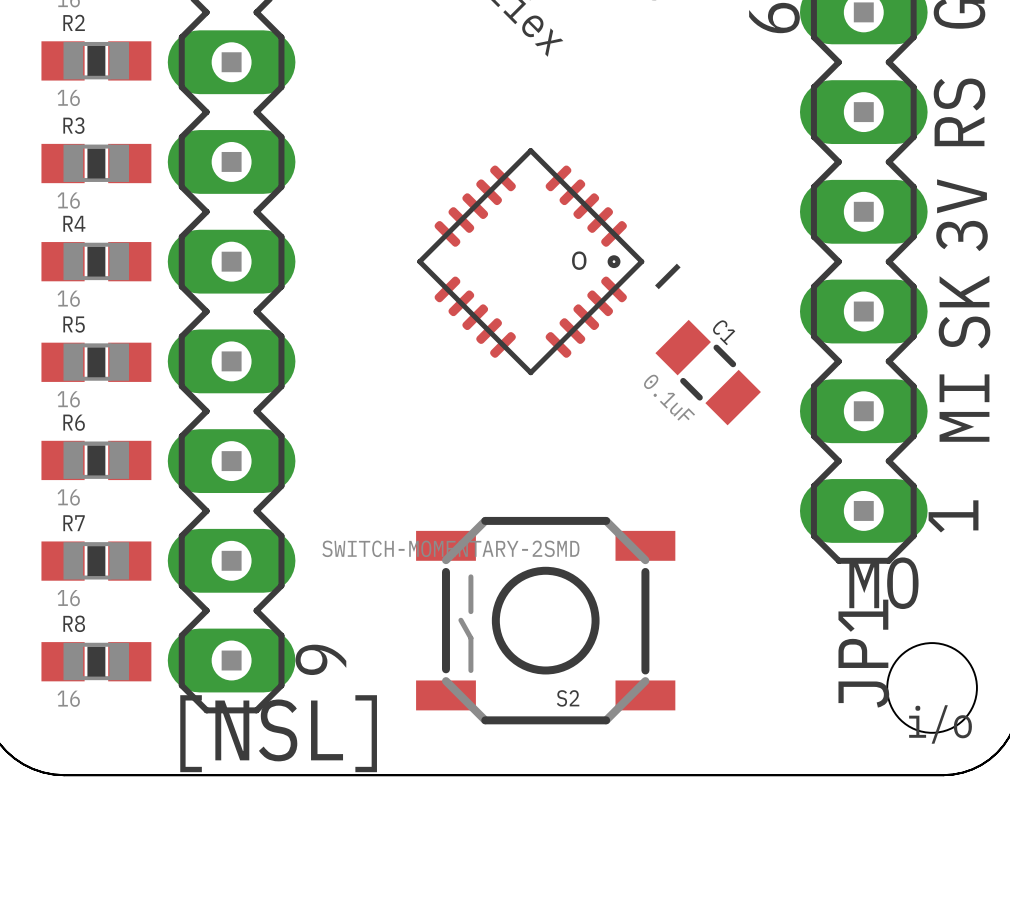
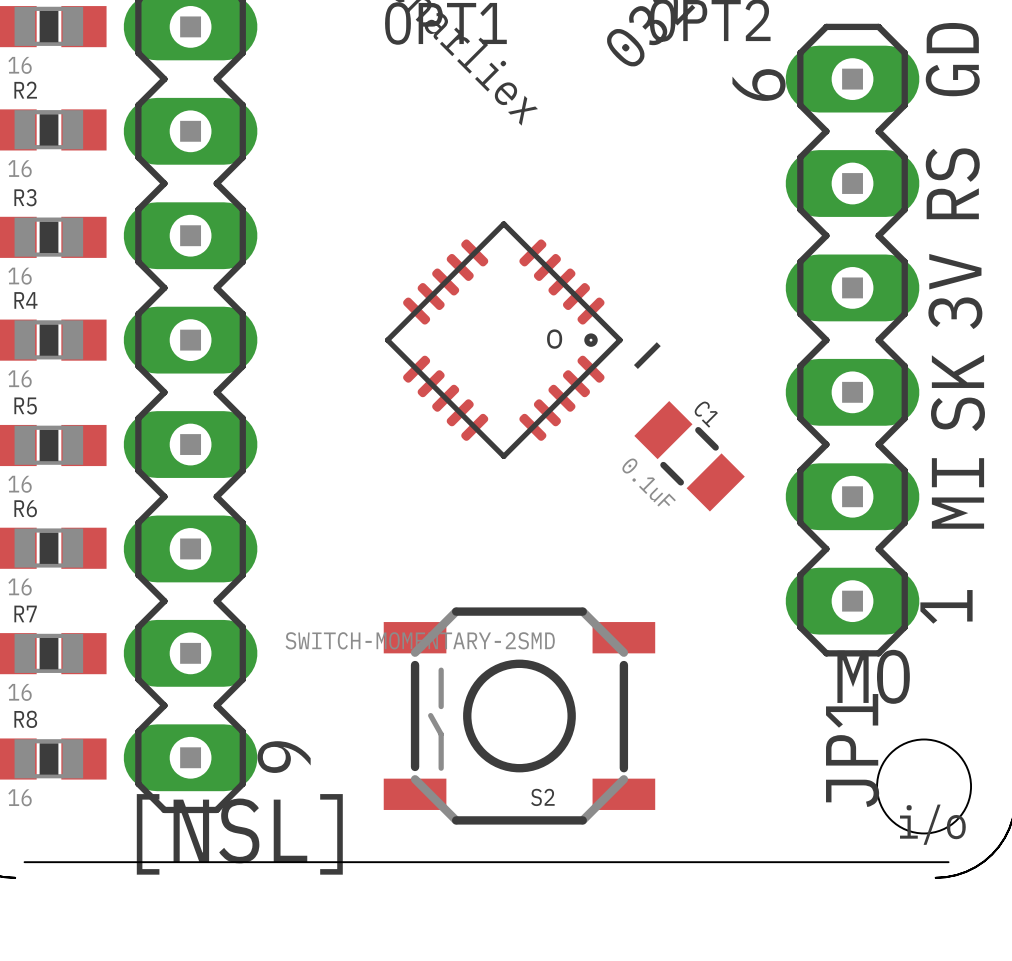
board edge: none -> (24, 862) (948, 862)
board edge: (64, 775) (943, 775) -> none

